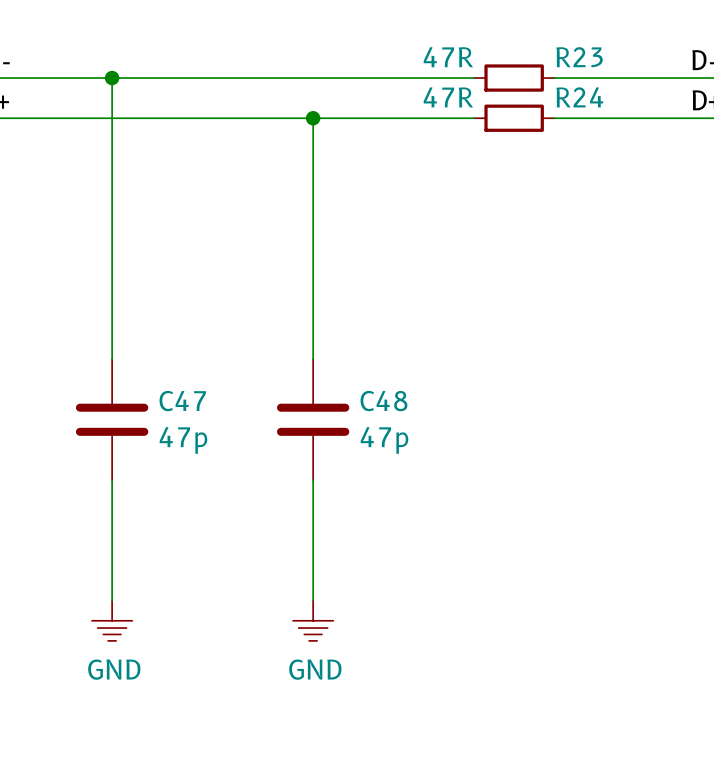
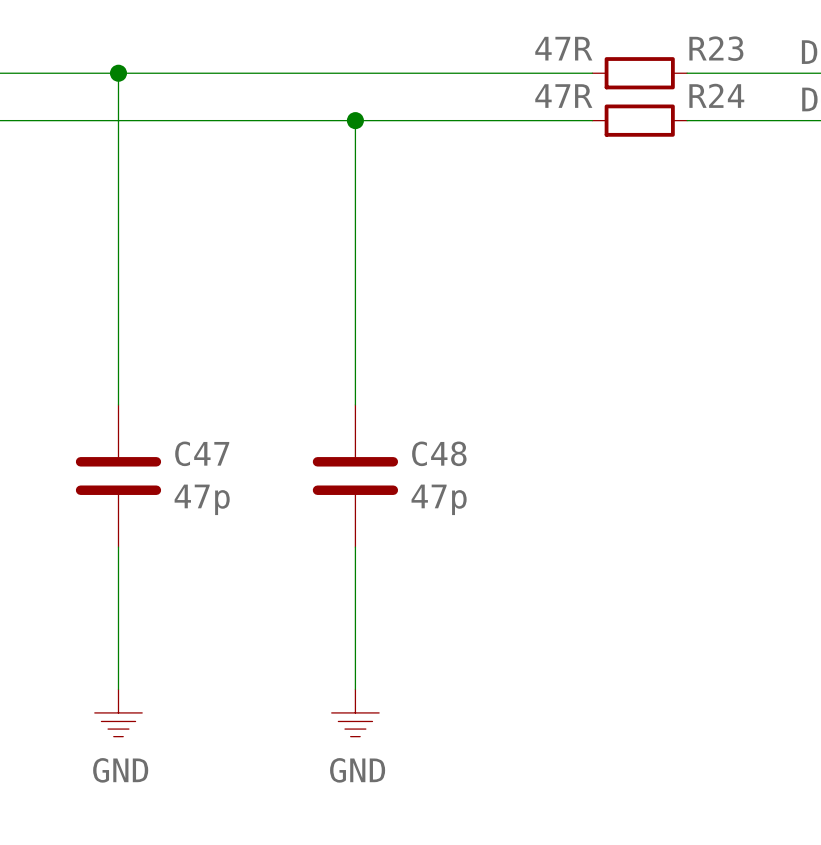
R23 position: (514, 78) -> (639, 73)
wire: (554, 78) (594, 78) -> (544, 73) (592, 73)
R24 position: (514, 118) -> (639, 120)
wire: (554, 118) (594, 118) -> (544, 120) (592, 120)

